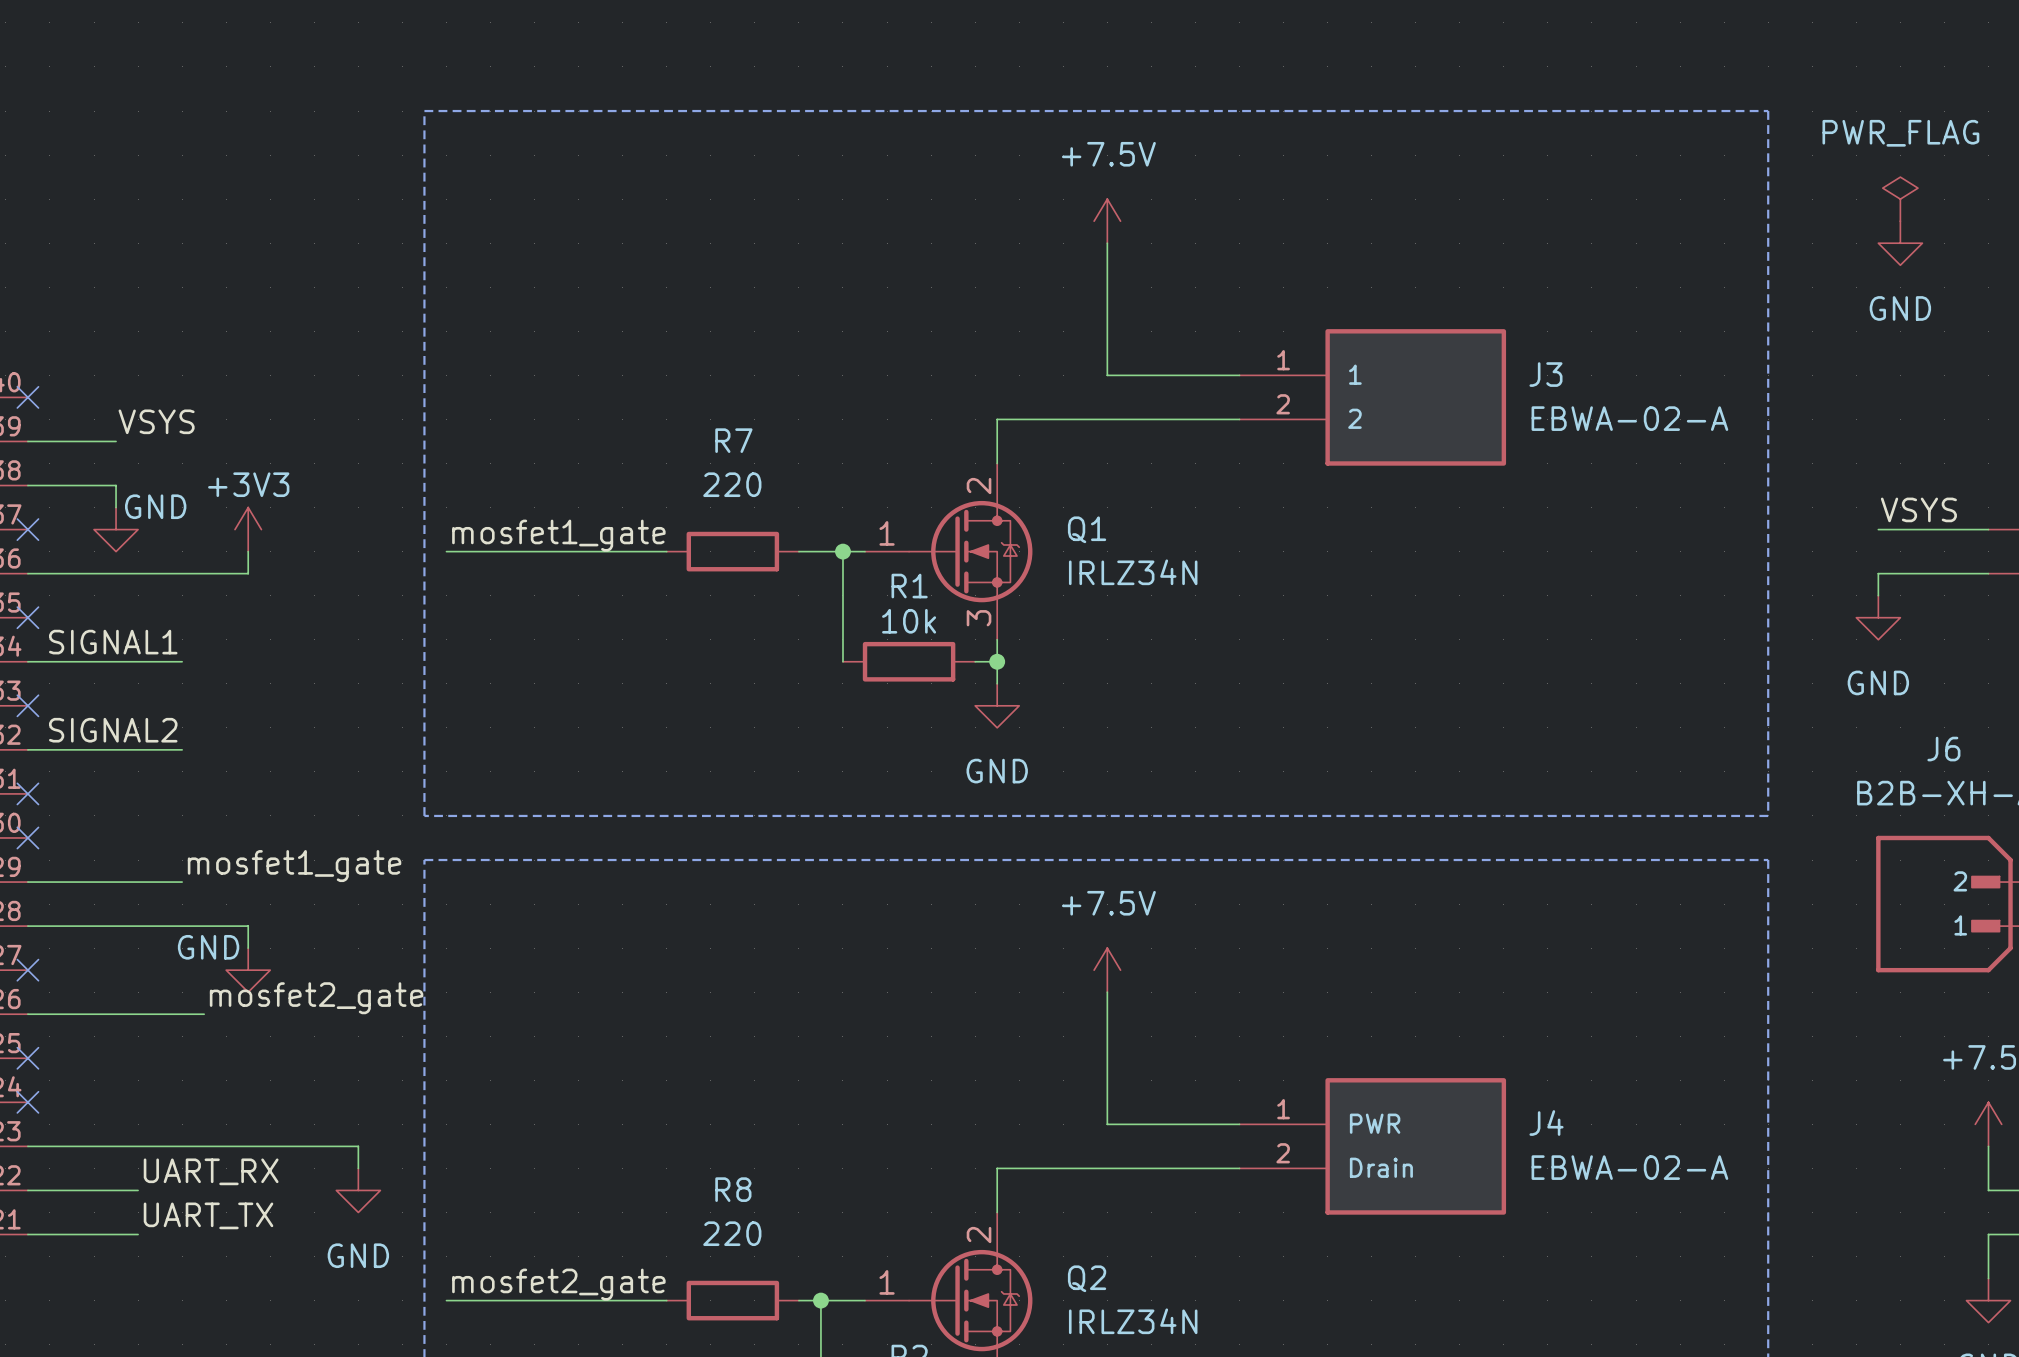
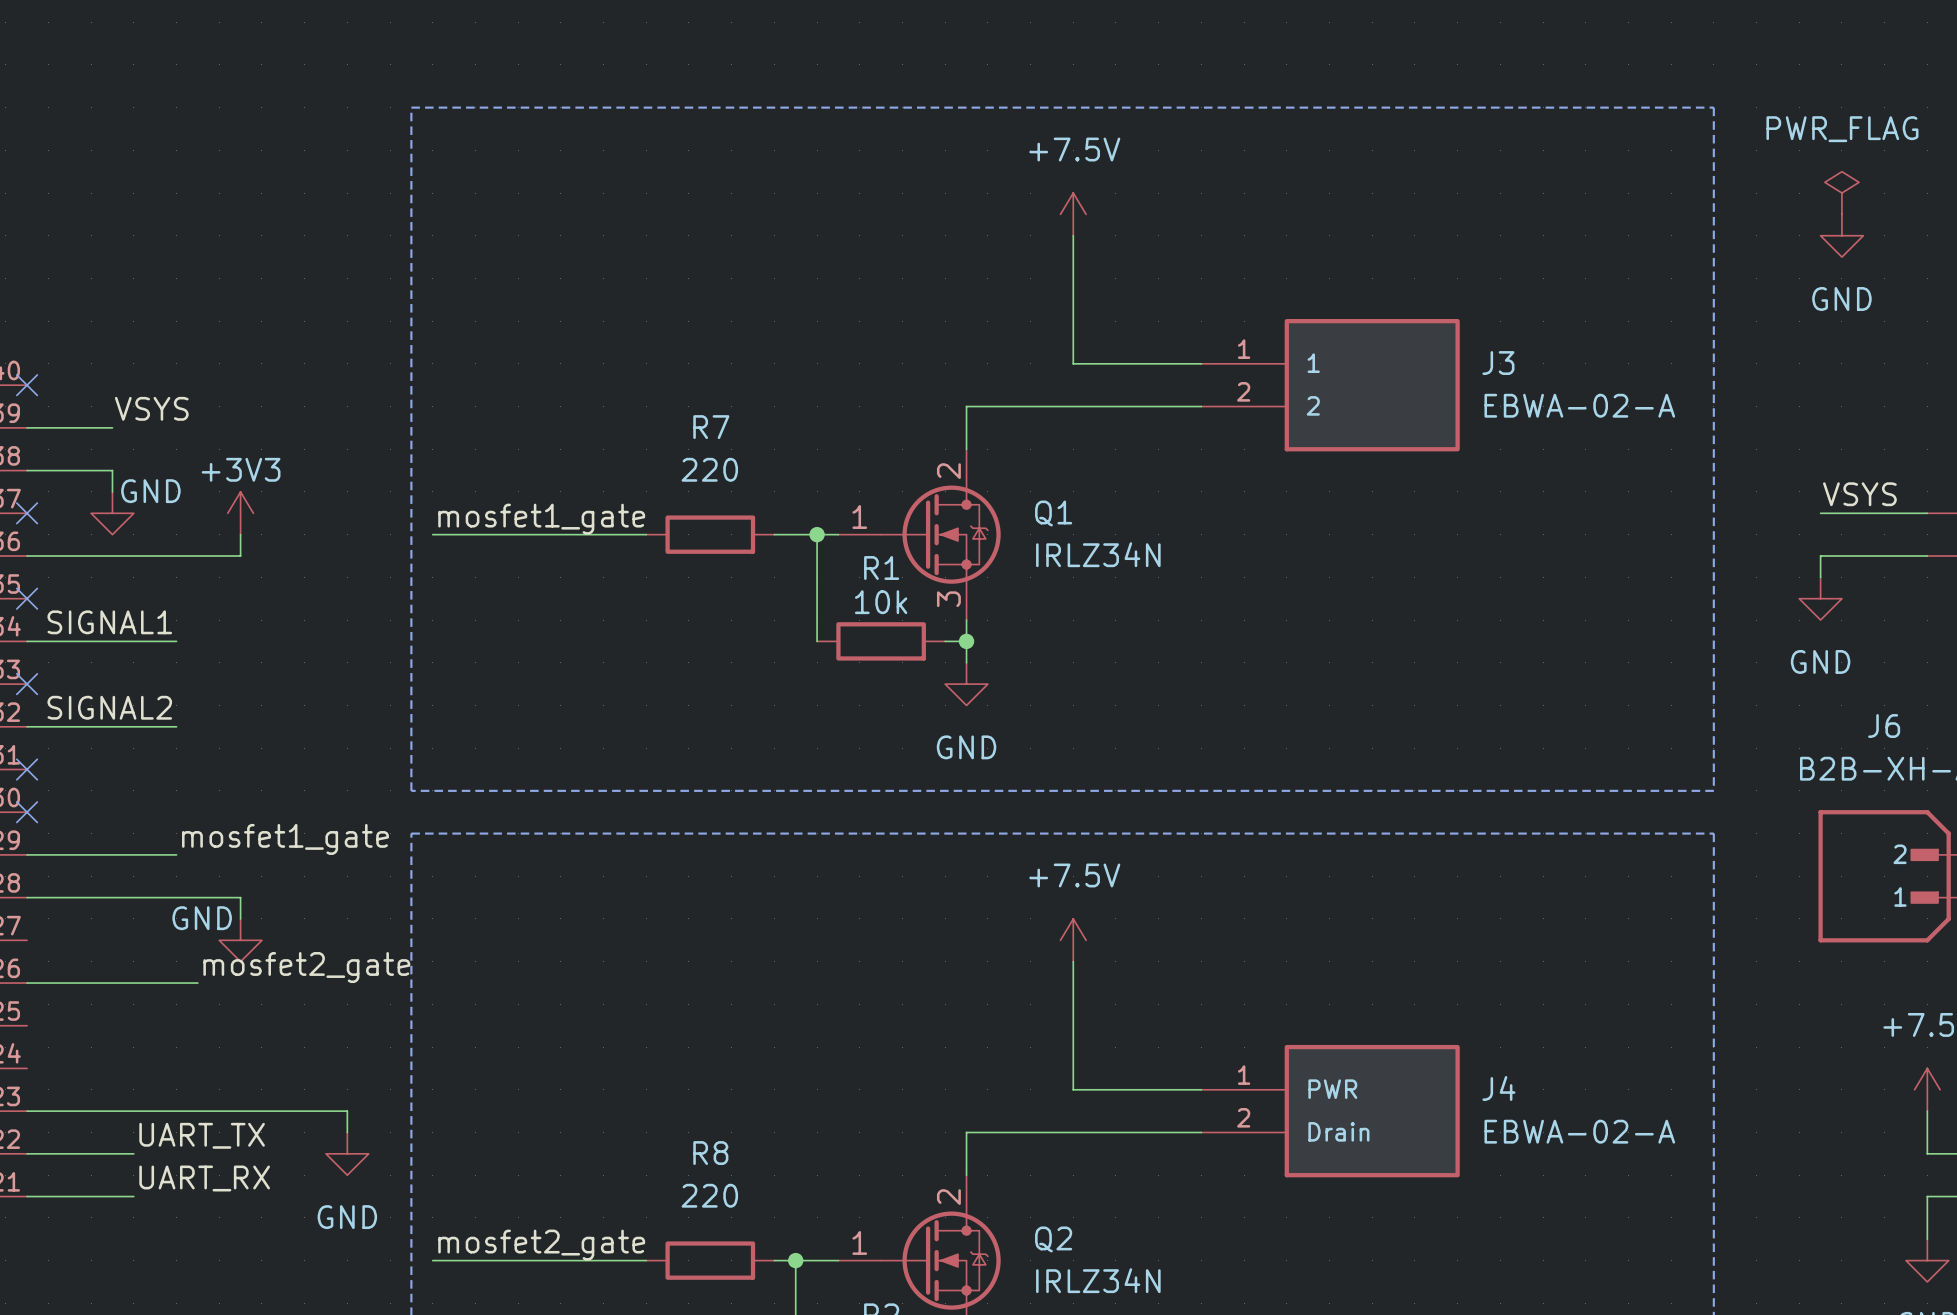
no-connect mark: (27, 970) -> none
no-connect mark: (27, 1058) -> none
no-connect mark: (27, 1102) -> none
label: UART_RX (211, 1171) -> UART_TX (202, 1135)
label: UART_TX (208, 1215) -> UART_RX (204, 1178)

